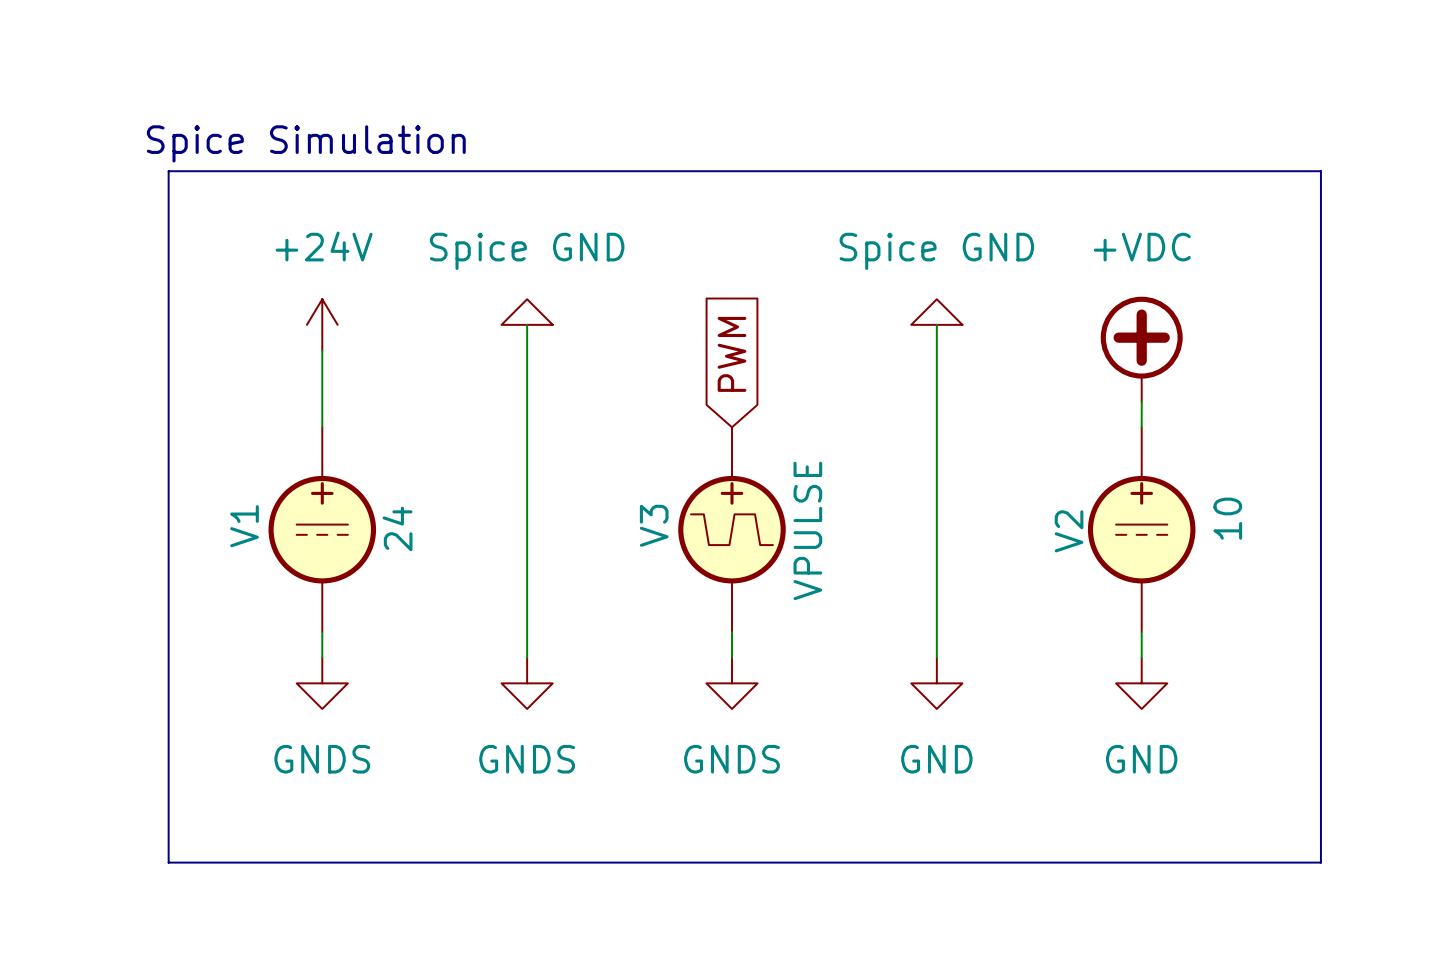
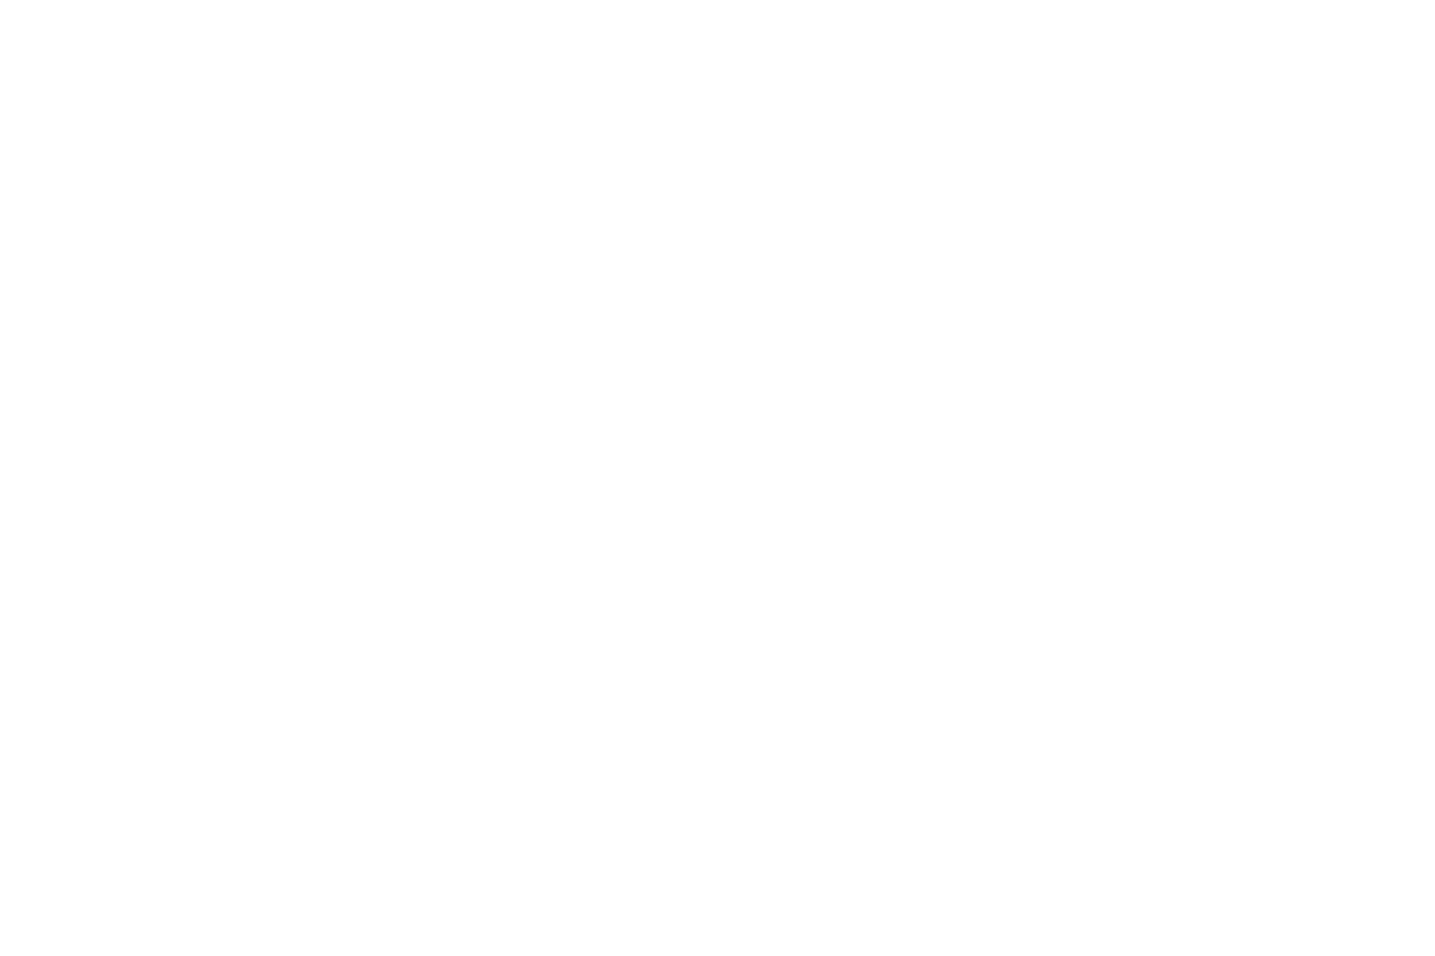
text: Spice Simulation (306, 143) -> none
line: (168, 171) (1320, 171) (1320, 862) (168, 862) (168, 171) -> none
power symbol: Spice GND (527, 312) -> none
power symbol: Spice GND (936, 312) -> none
power symbol: +24V (322, 324) -> none
wire: (527, 324) (527, 657) -> none
wire: (936, 324) (936, 657) -> none
power symbol: +VDC (1141, 349) -> none
wire: (322, 350) (322, 427) -> none
global label: PWM (731, 354) -> none
wire: (1141, 401) (1141, 427) -> none
V1: 24 (322, 529) -> none
V3: VPULSE (731, 529) -> none
V2: 10 (1141, 529) -> none
wire: (322, 632) (322, 657) -> none
wire: (731, 632) (731, 657) -> none
wire: (1141, 632) (1141, 657) -> none
power symbol: GNDS (322, 683) -> none
power symbol: GNDS (527, 683) -> none
power symbol: GNDS (731, 683) -> none
power symbol: GND (936, 683) -> none
power symbol: GND (1141, 683) -> none

